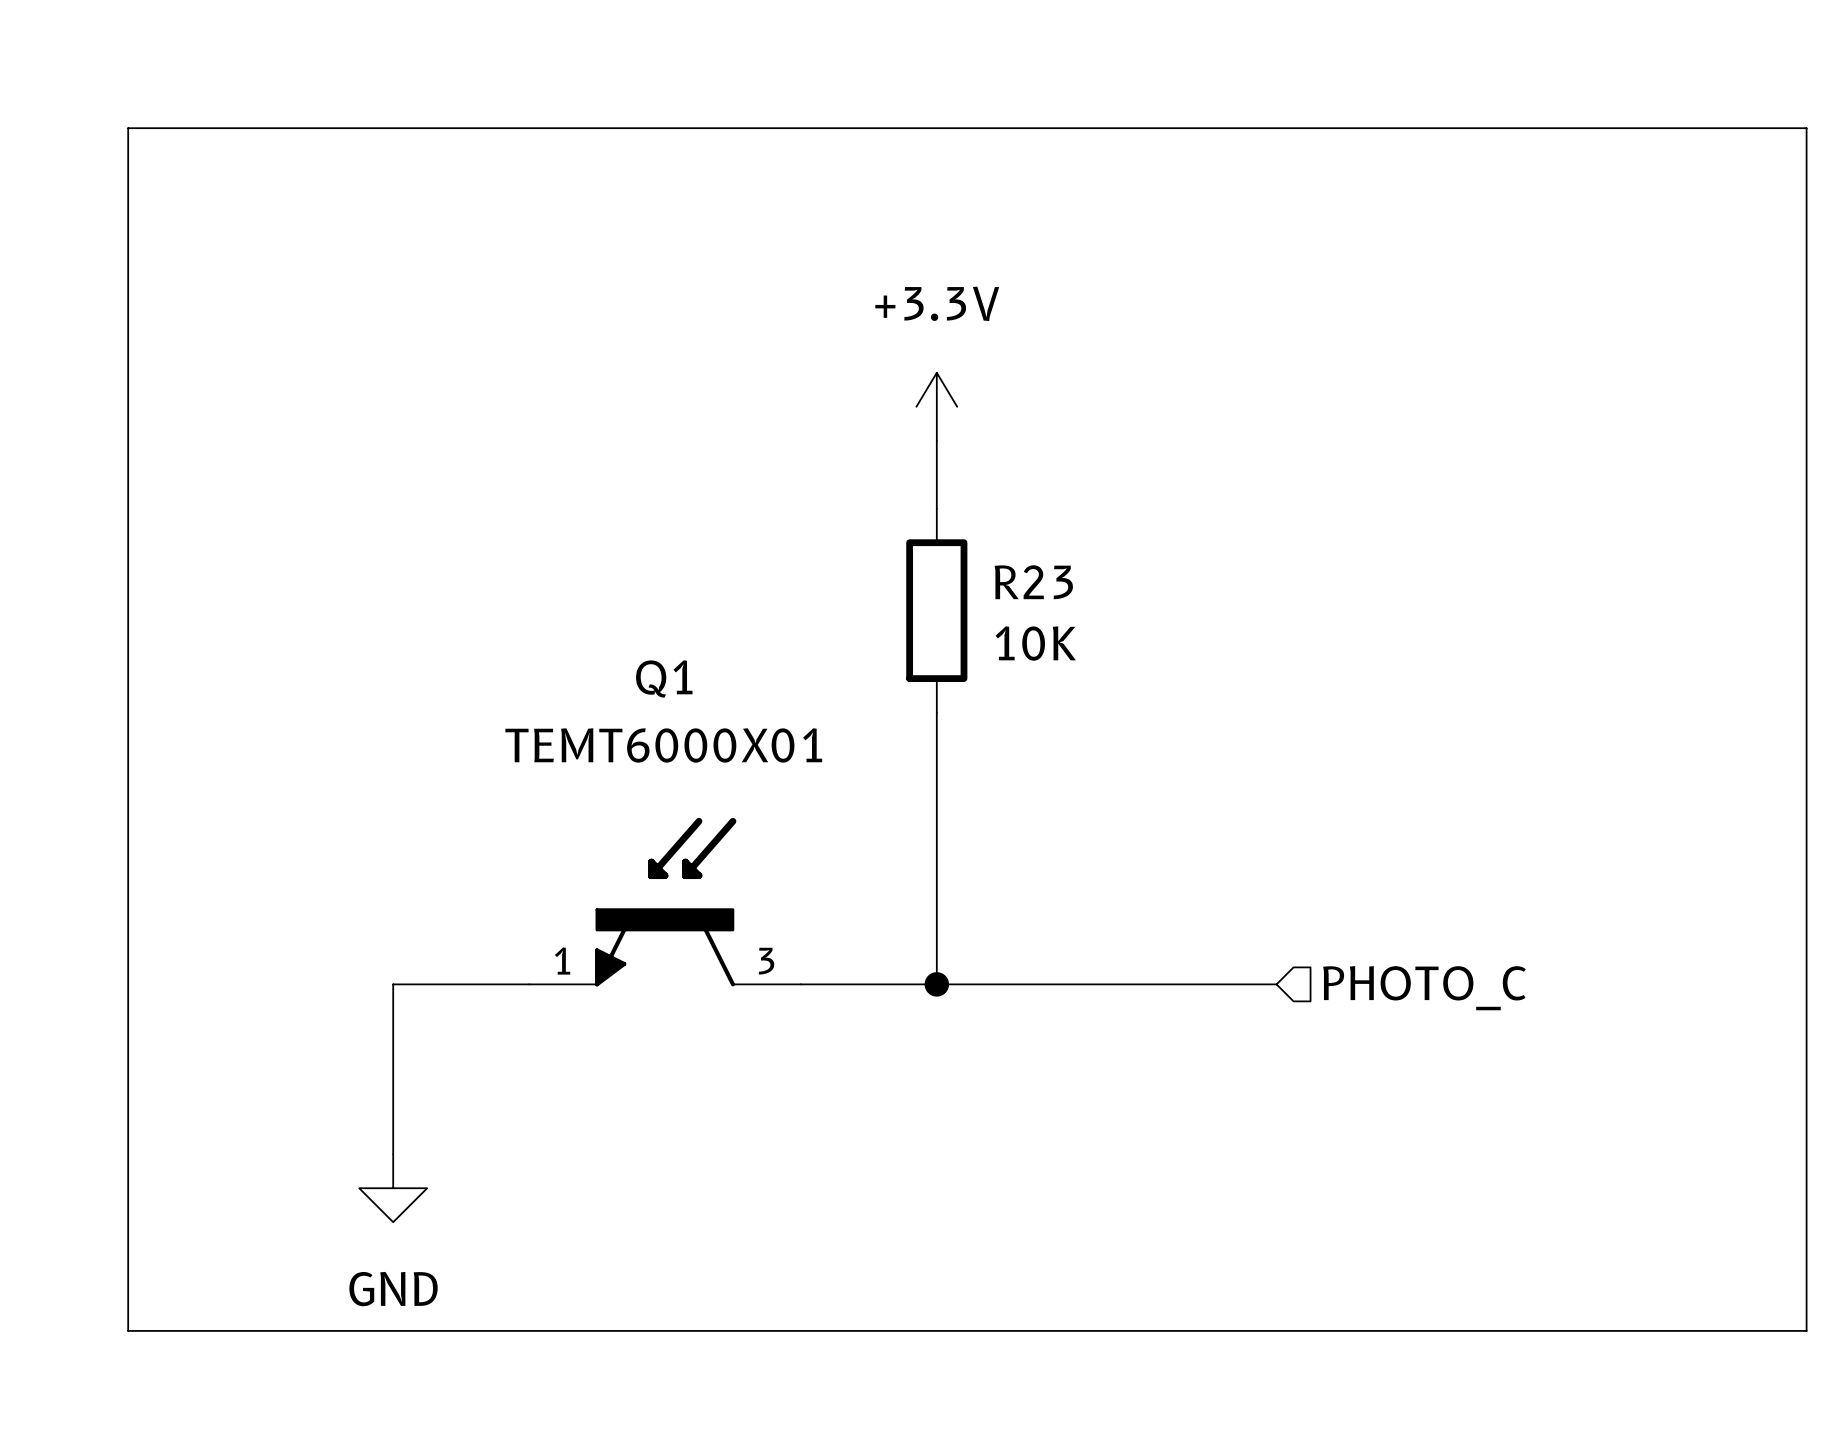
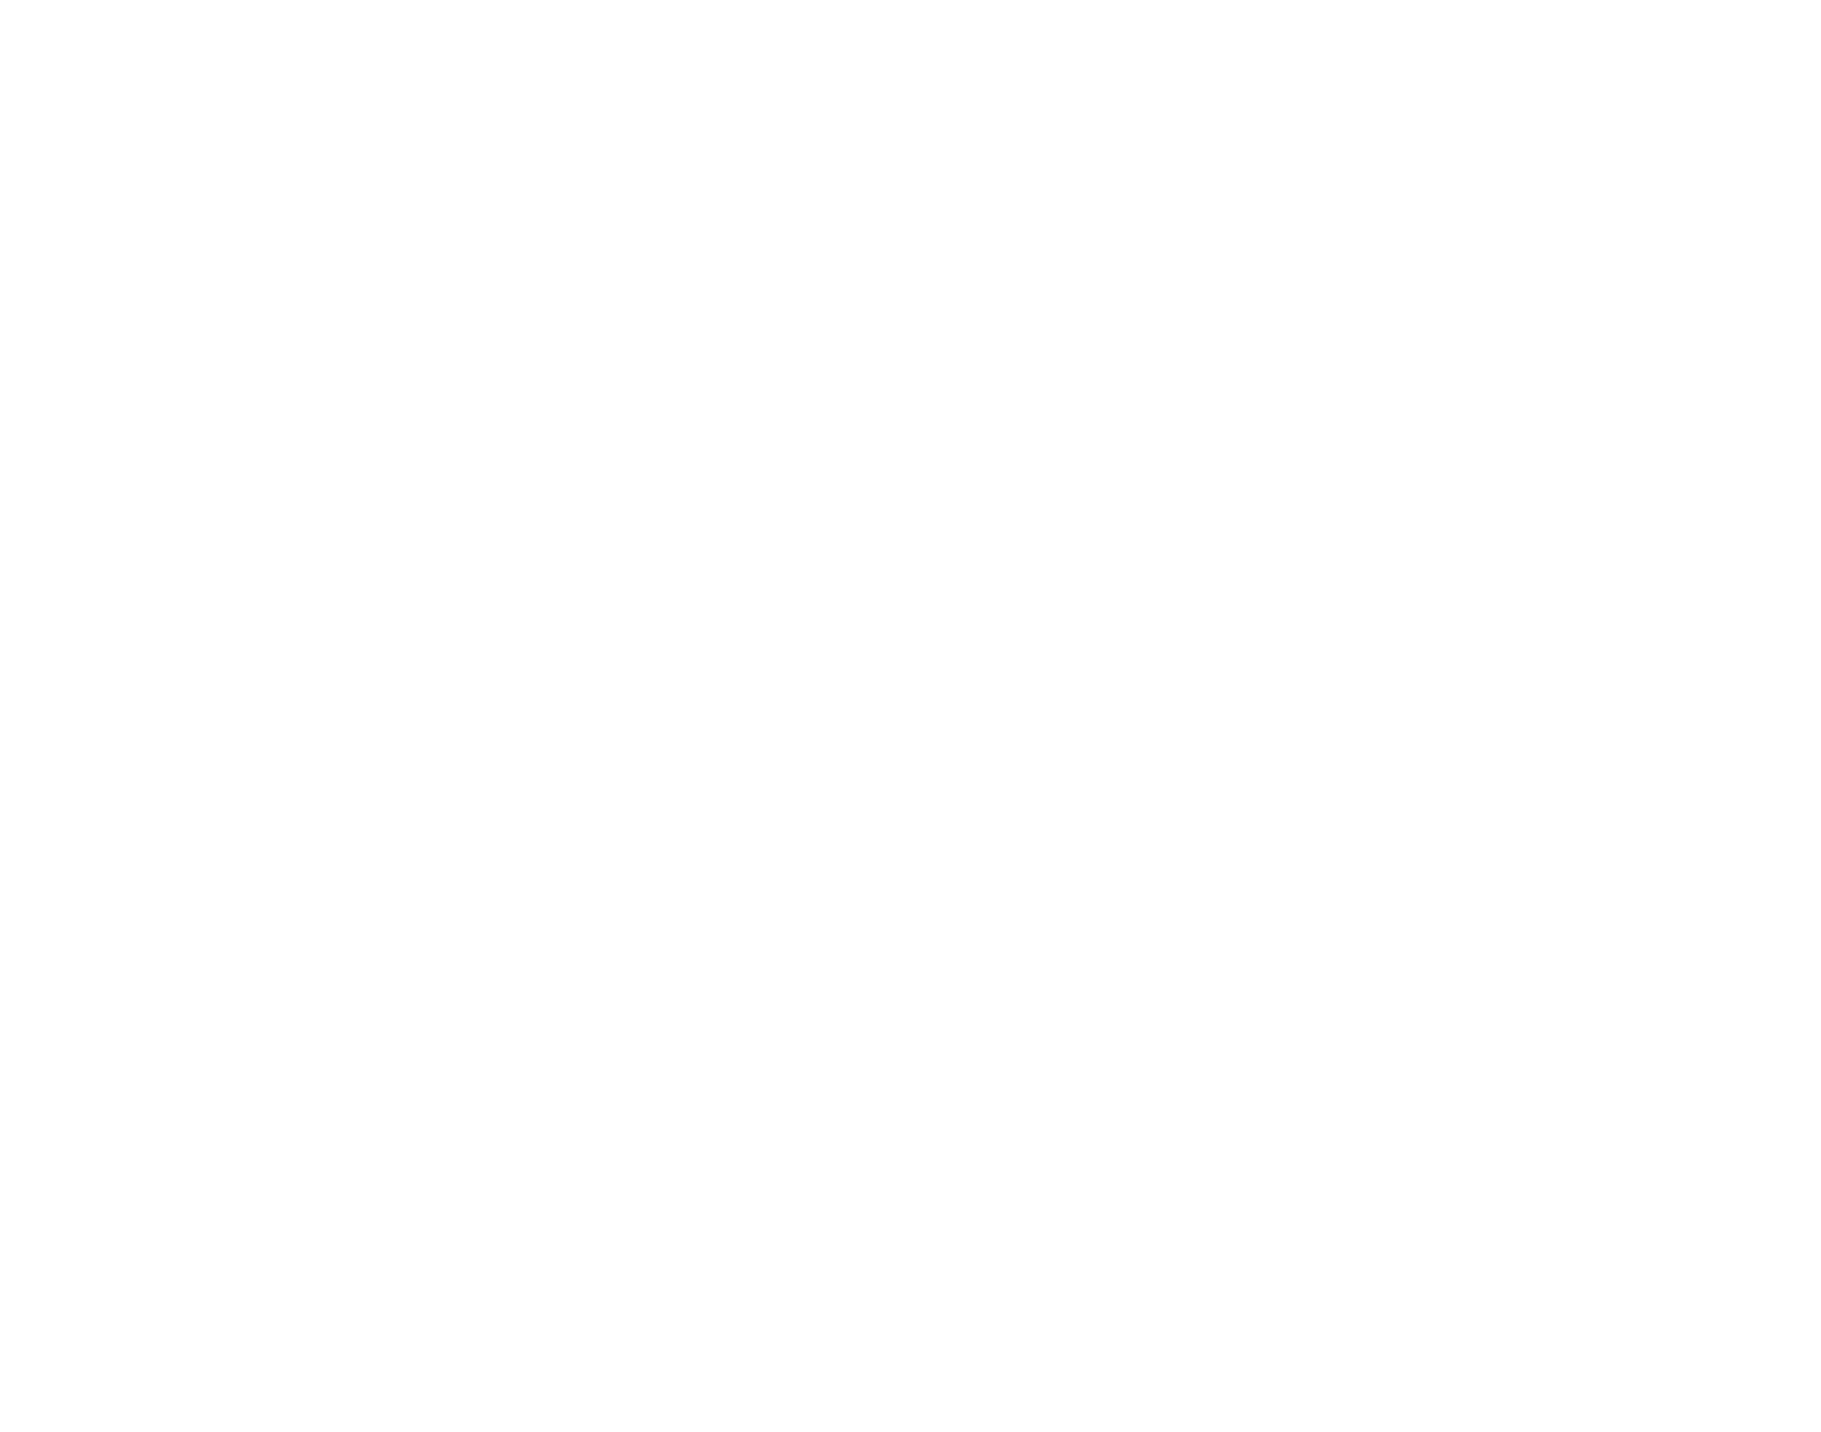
line: (128, 128) (1806, 128) (1806, 1330) (128, 1330) (128, 128) -> none
power symbol: +3.3V (936, 406) -> none
wire: (936, 440) (936, 508) -> none
R23: 10K (936, 610) -> none
wire: (936, 712) (936, 984) -> none
Q1: TEMT6000X01 (665, 902) -> none
wire: (529, 984) (393, 984) (393, 1154) -> none
wire: (800, 984) (1276, 984) -> none
junction: (936, 984) -> none
hierarchical label: PHOTO_C (1424, 988) -> none
power symbol: GND (393, 1188) -> none

